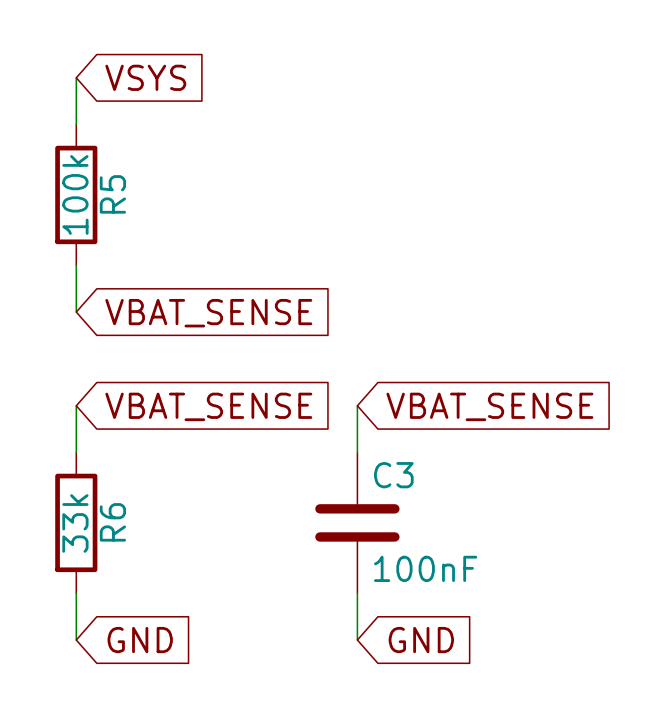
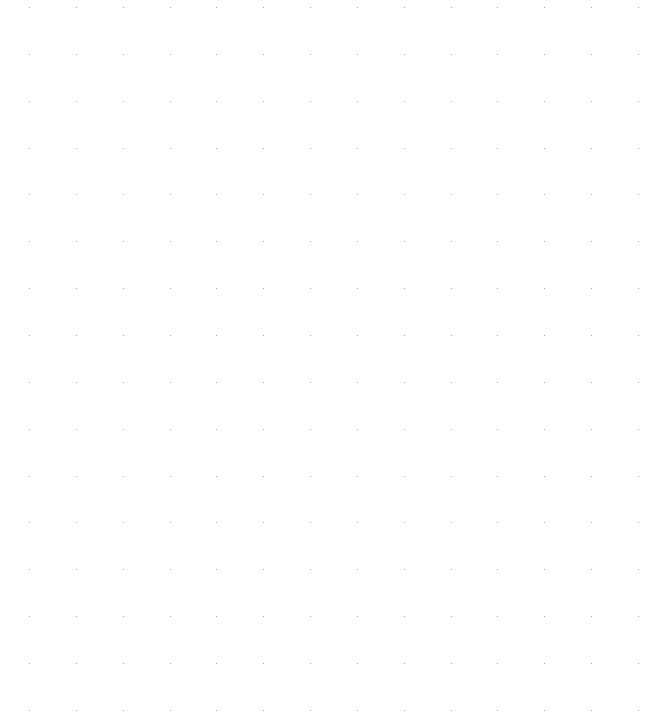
wire: (76, 77) (76, 124) -> none
global label: VSYS (145, 77) -> none
R5: 100k (76, 194) -> none
wire: (76, 265) (76, 312) -> none
global label: VBAT_SENSE (208, 313) -> none
wire: (76, 405) (76, 452) -> none
wire: (357, 405) (357, 452) -> none
global label: VBAT_SENSE (208, 406) -> none
global label: VBAT_SENSE (489, 406) -> none
R6: 33k (76, 522) -> none
C3: 100nF (357, 522) -> none
wire: (76, 593) (76, 640) -> none
wire: (357, 593) (357, 640) -> none
global label: GND (140, 640) -> none
global label: GND (421, 640) -> none

